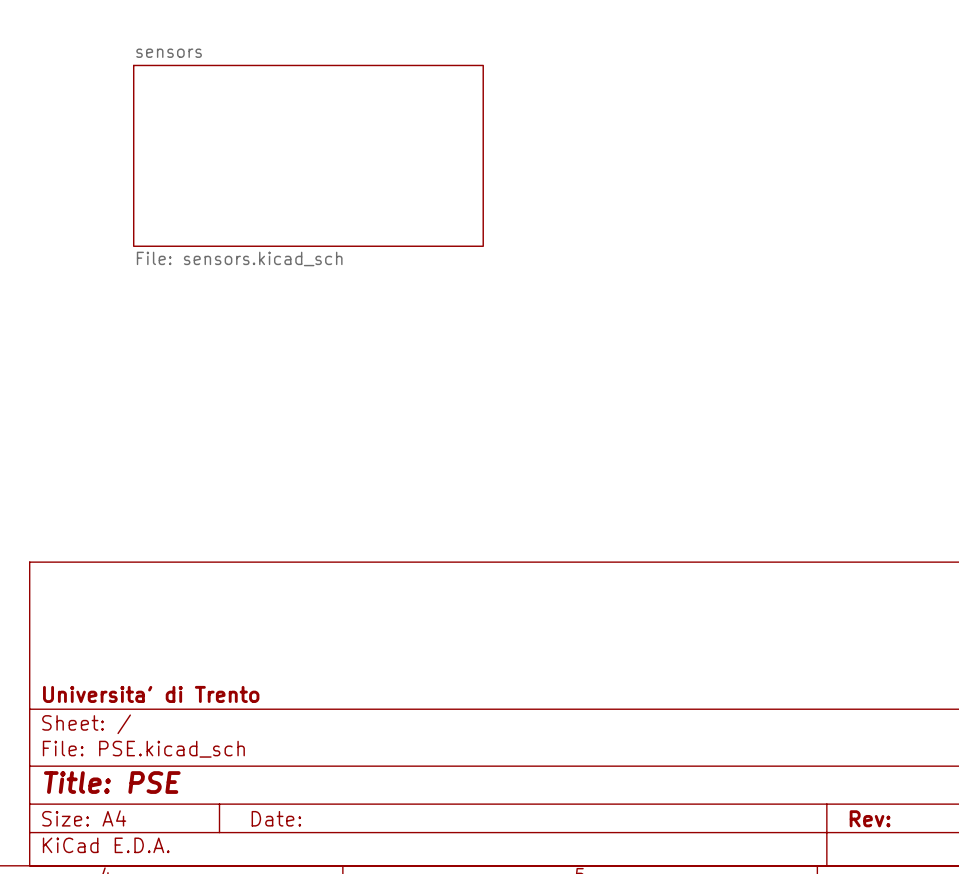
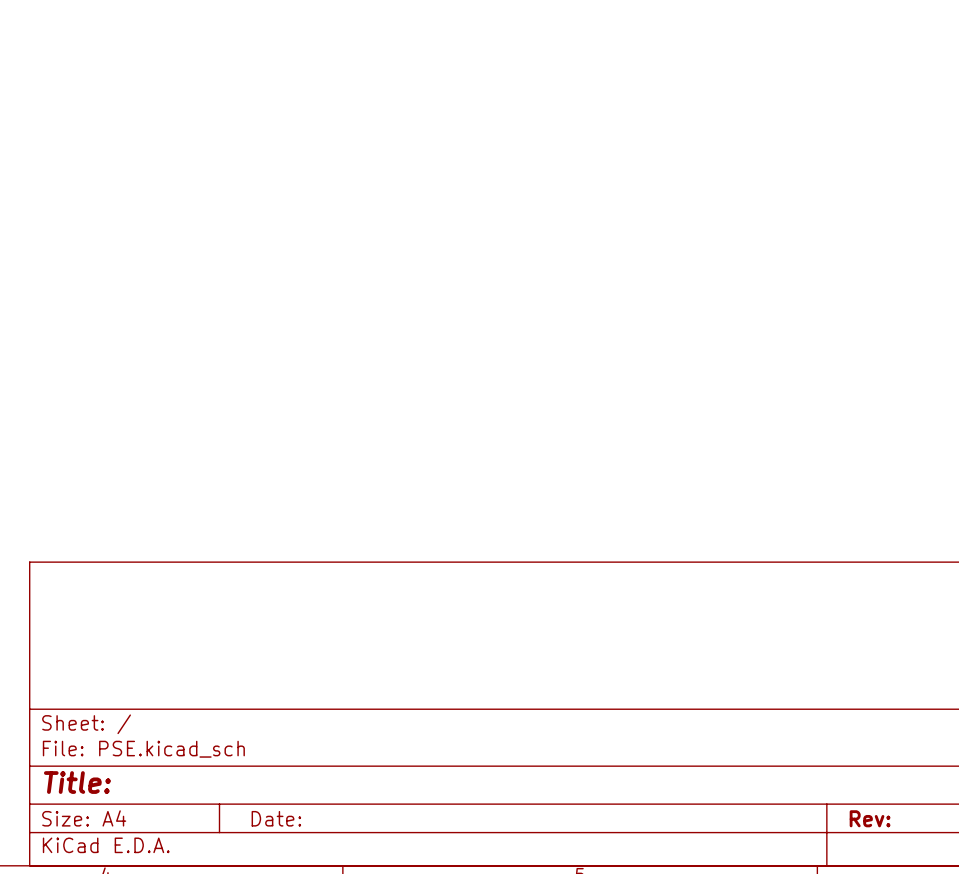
sheet sensors: File: sensors.kicad_sch (308, 155) -> none
title block: Universita' di Trento (151, 694) -> none
title block: Title: PSE (112, 782) -> Title: (77, 782)

